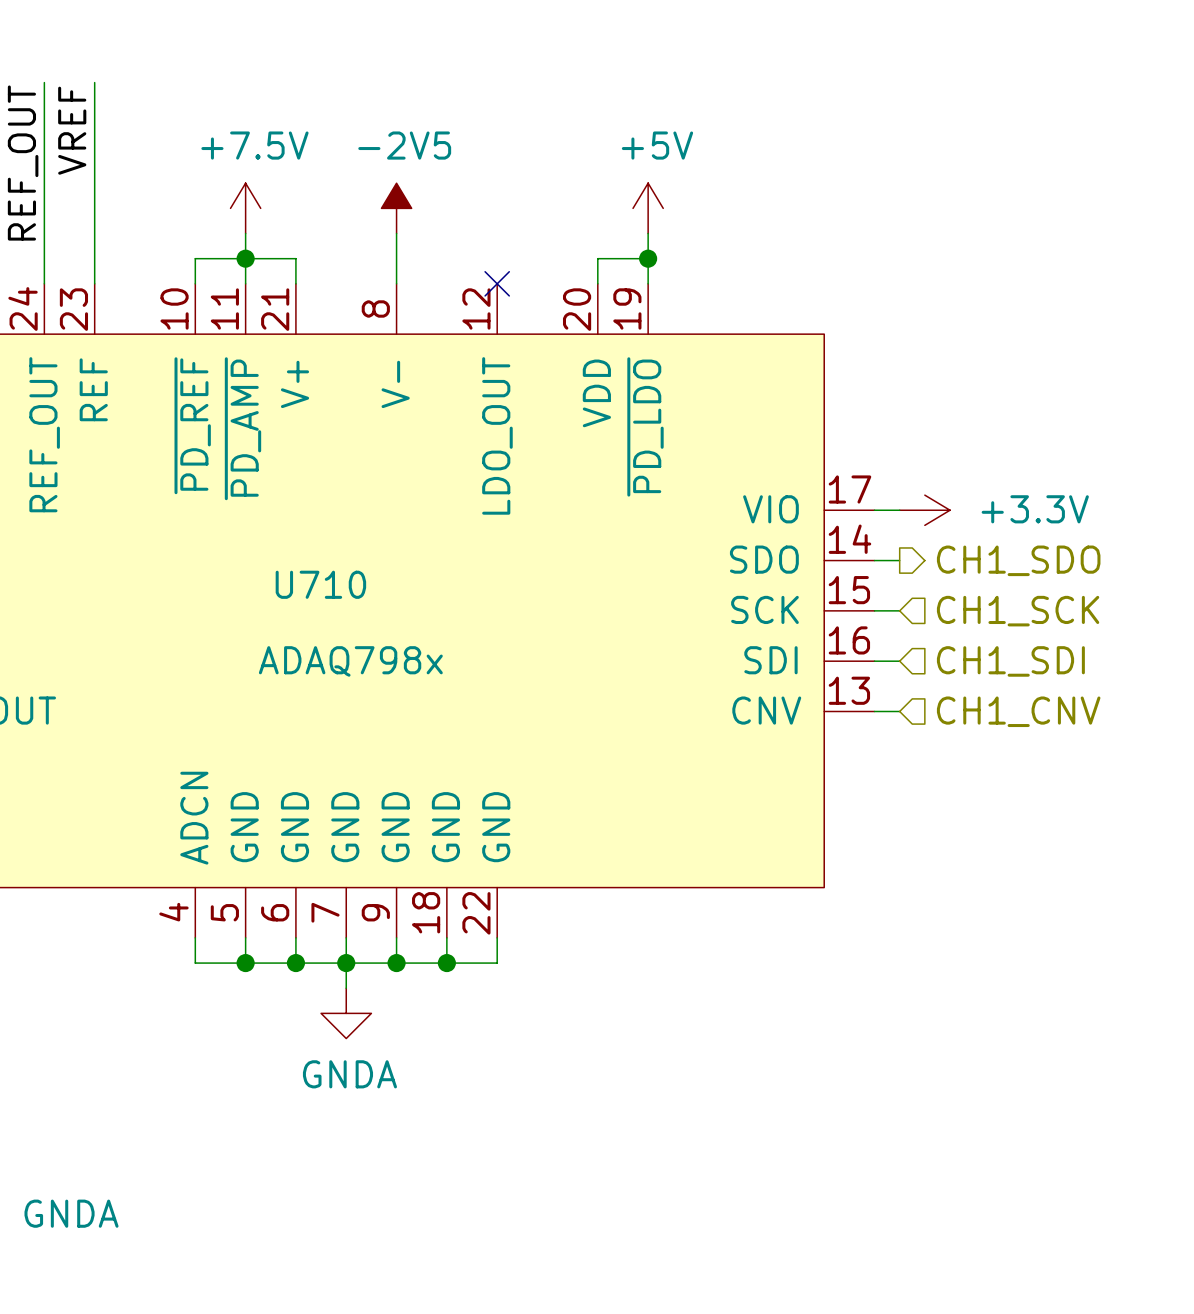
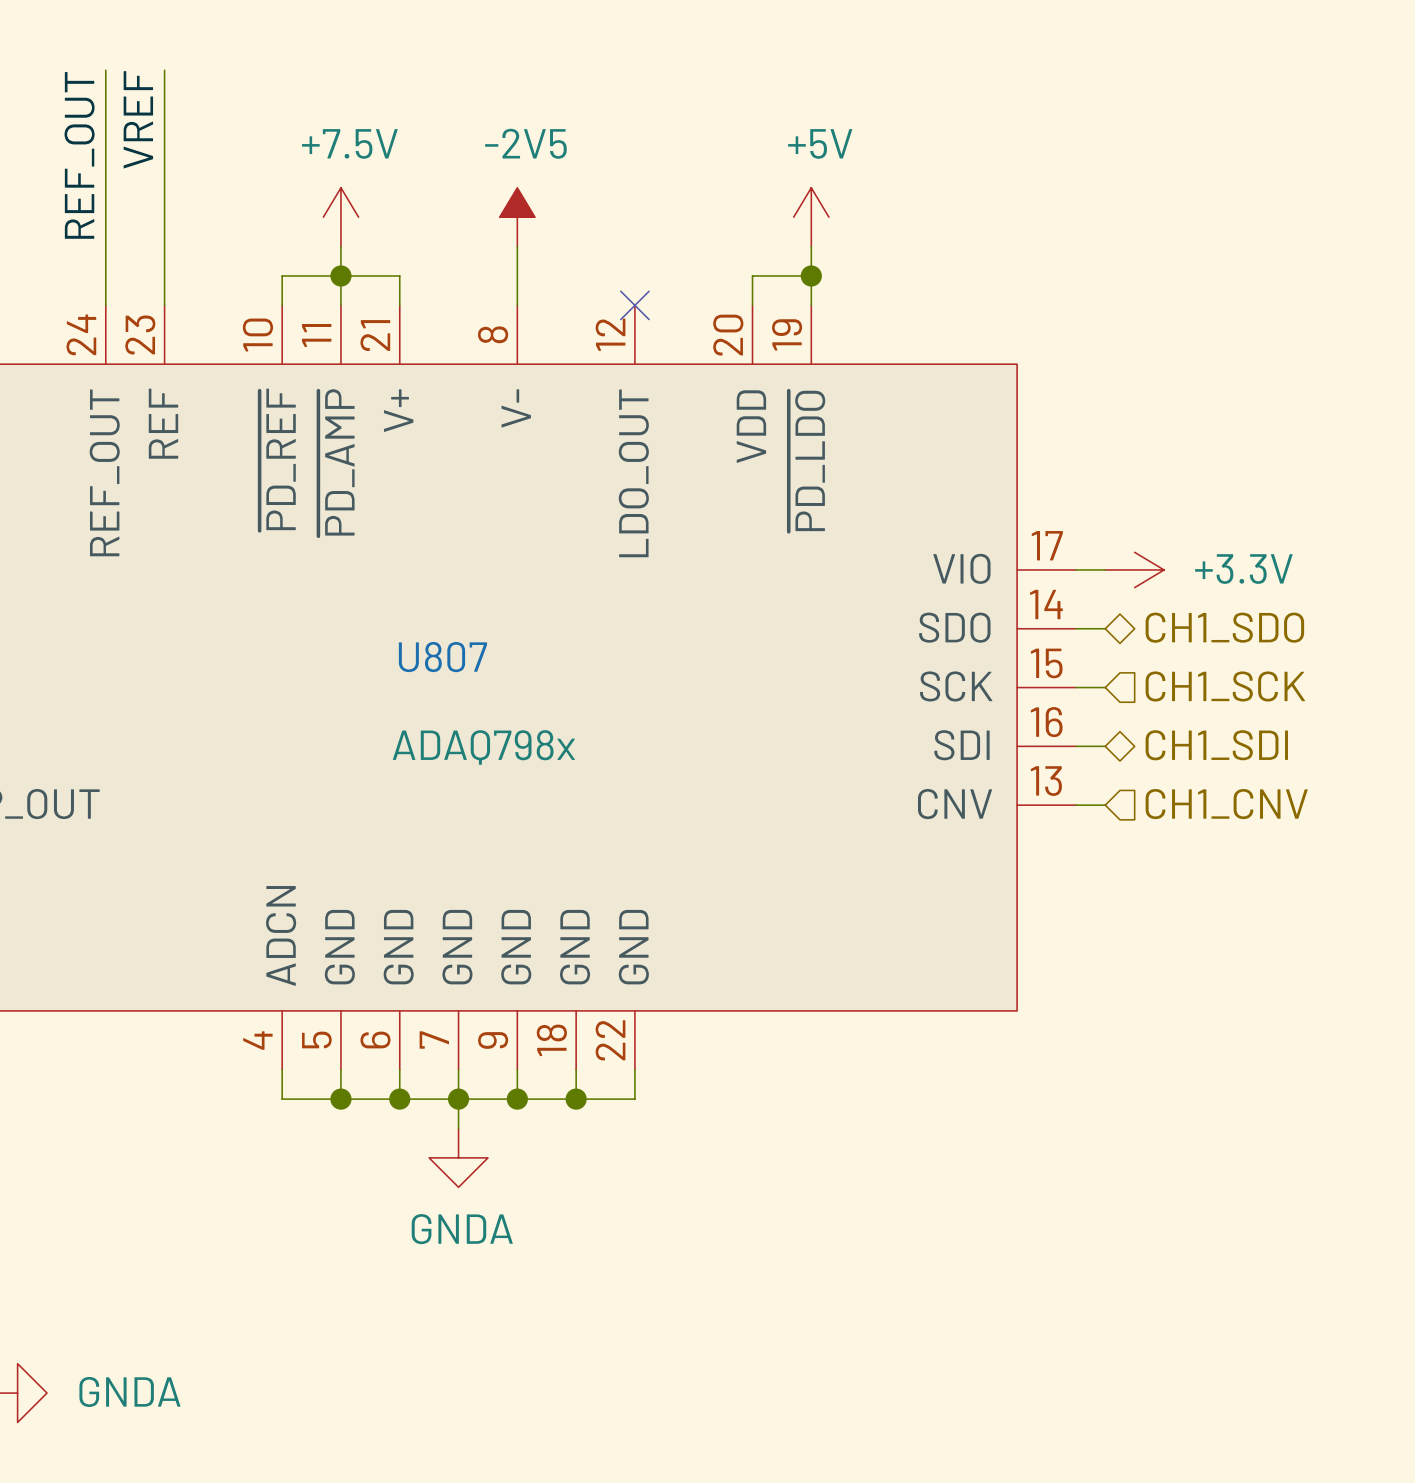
hierarchical label shape: output (1018, 560) -> bidirectional (1224, 627)
U710 name: U710 (320, 584) -> U807 (442, 657)
hierarchical label shape: input (1010, 661) -> bidirectional (1216, 745)

